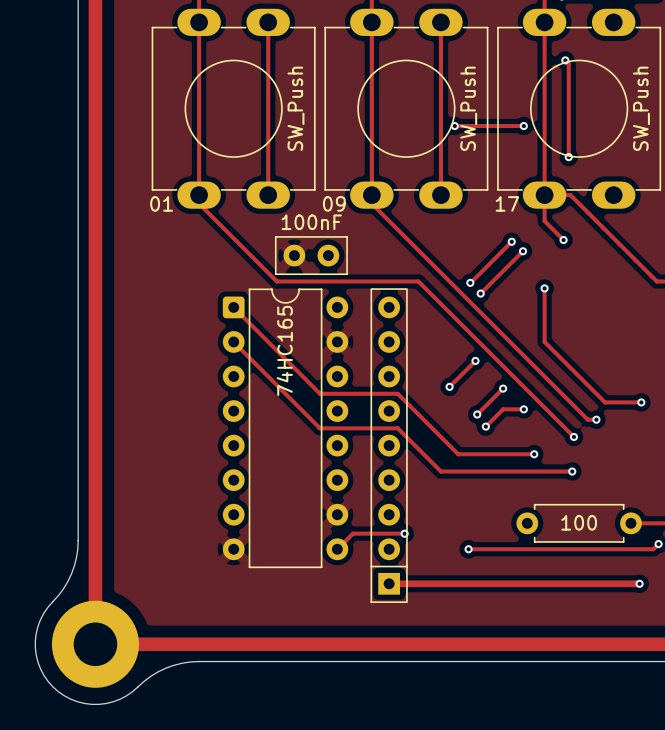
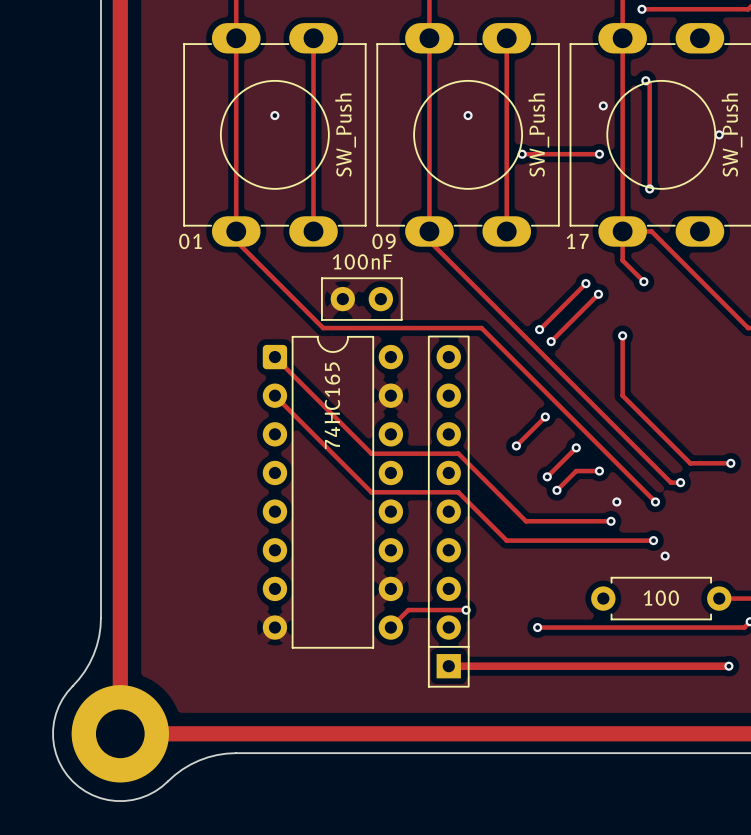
via: none -> (603, 105)
via: none -> (274, 115)
via: none -> (468, 115)
via: none -> (719, 134)
via: none -> (616, 501)
via: none -> (665, 556)

